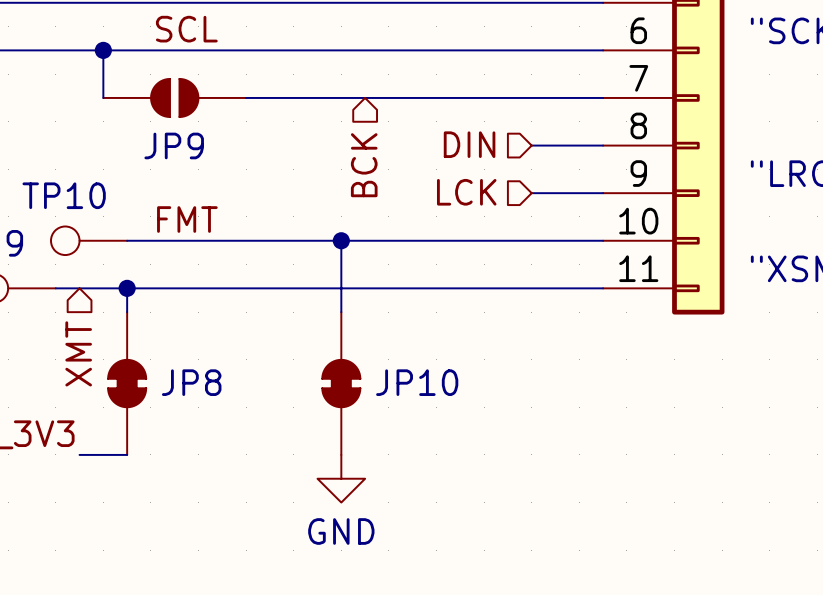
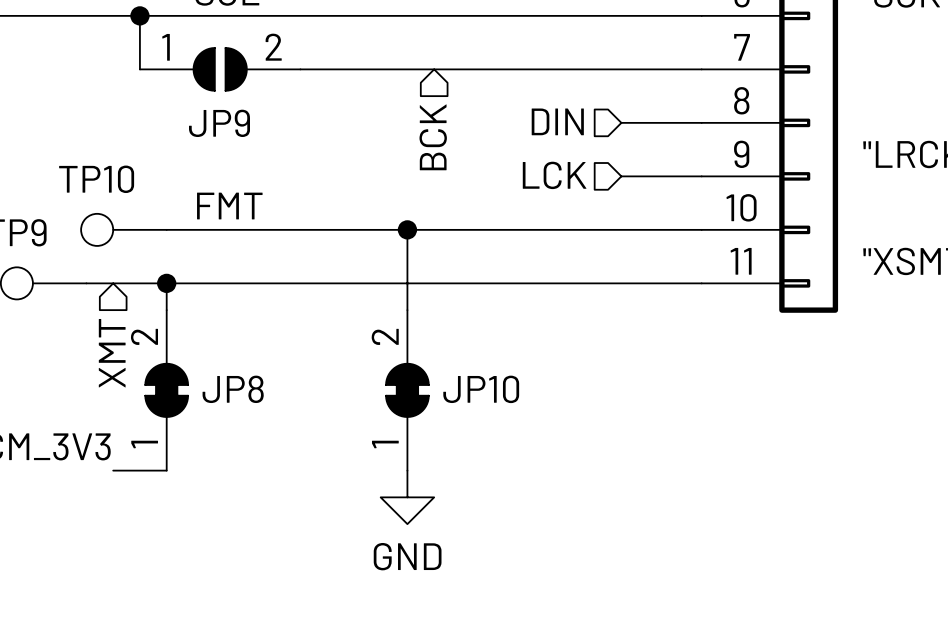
JP9 pin number: none -> 1 (166, 47)
JP9 pin number: none -> 2 (273, 47)
JP8 pin number: none -> 2 (144, 336)
JP10 pin number: none -> 2 (385, 336)
JP8 pin number: none -> 1 (144, 444)
JP10 pin number: none -> 1 (385, 444)

